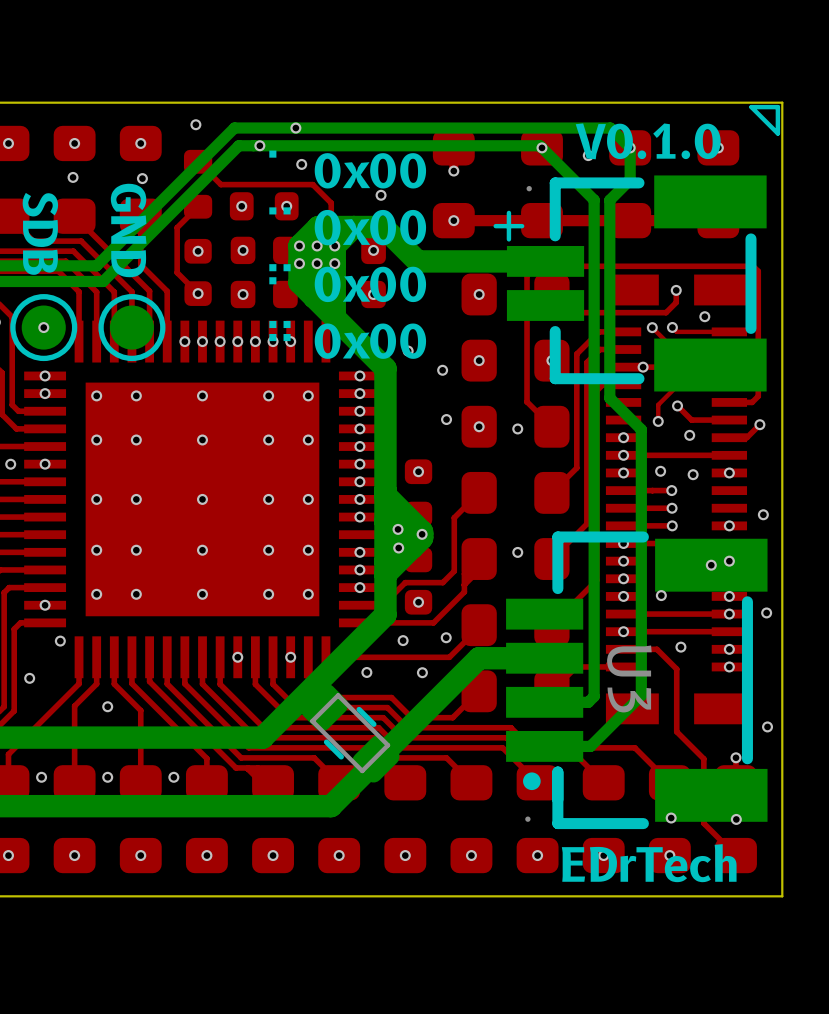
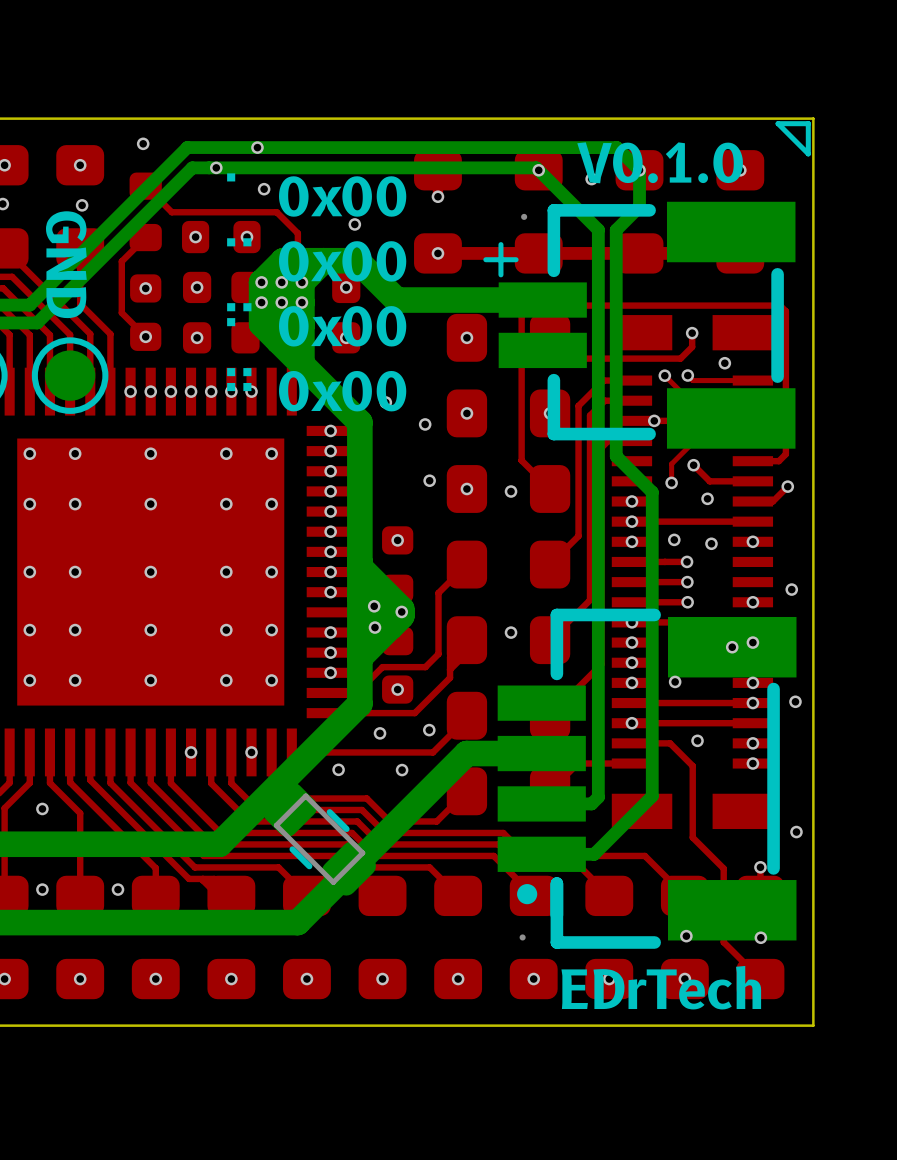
U3 name: U3 (629, 678) -> none

